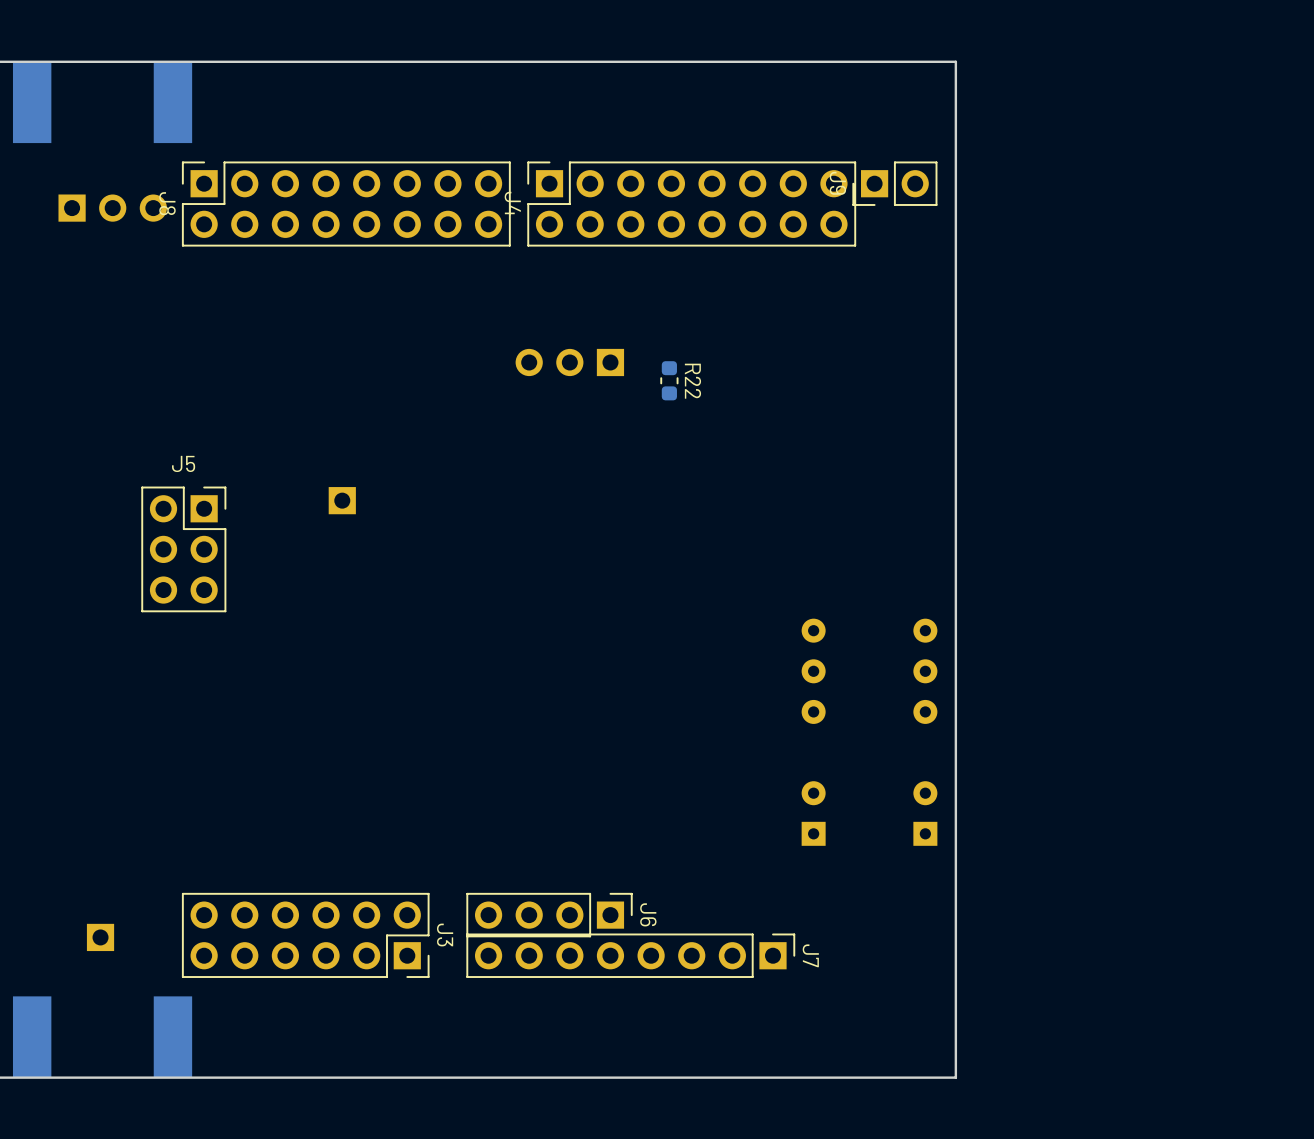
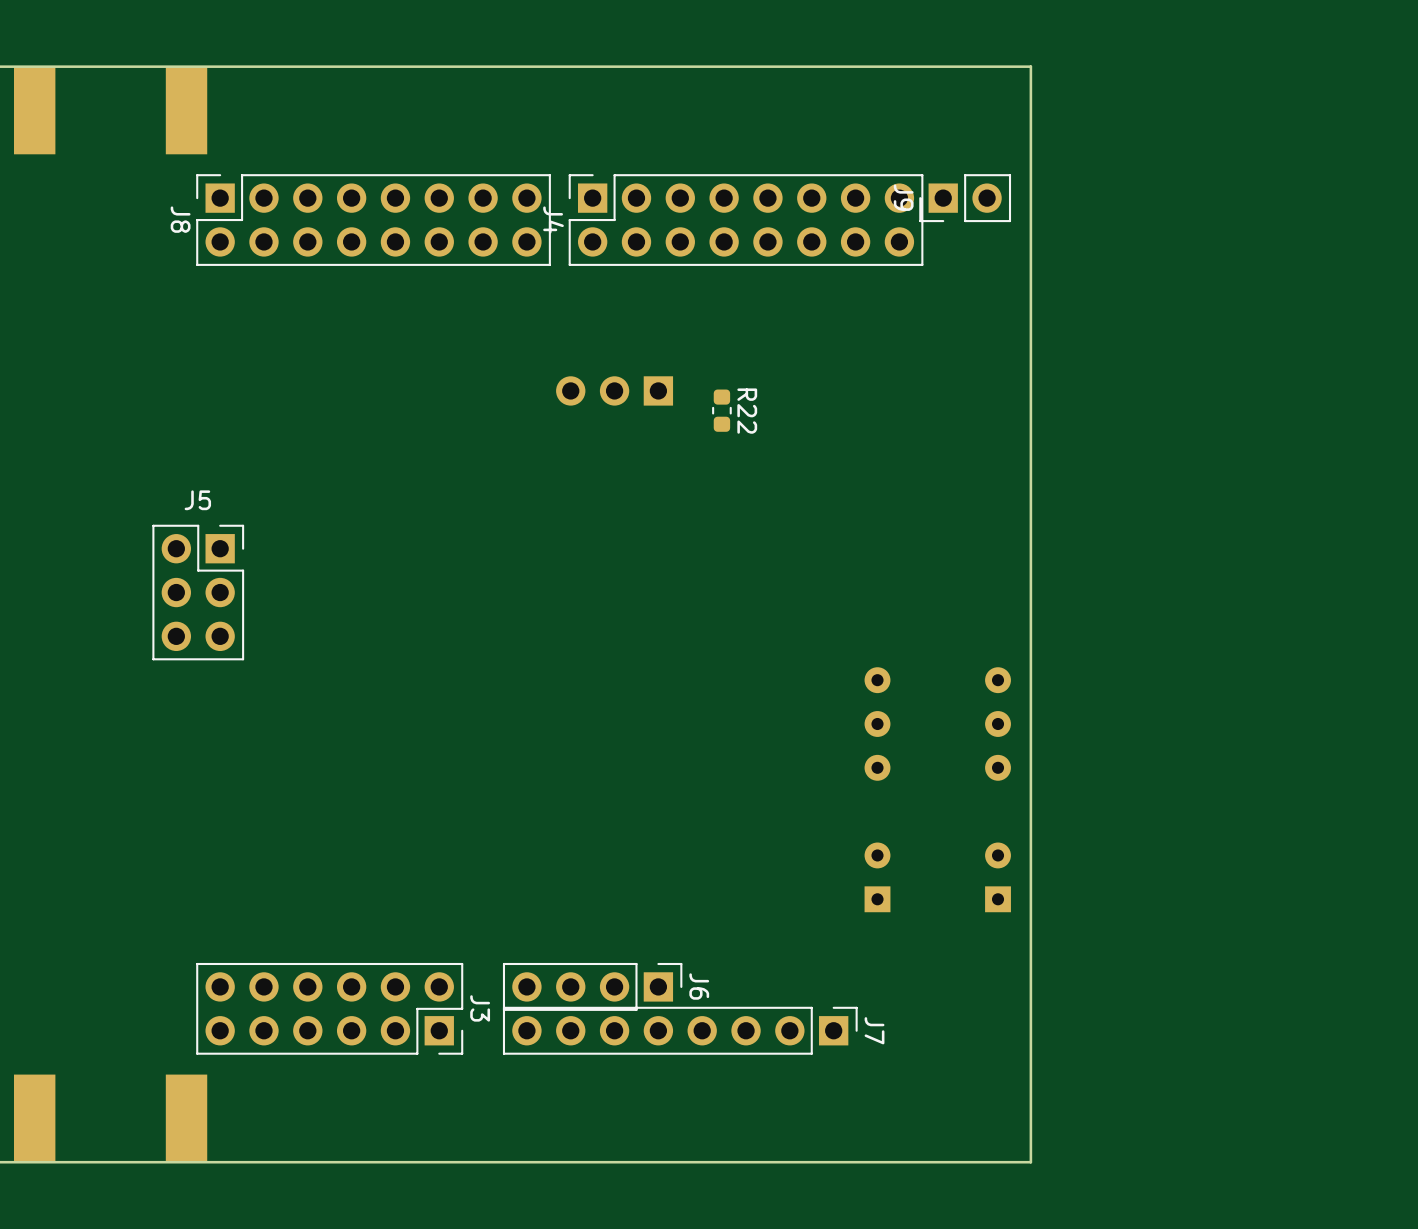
part: (112, 208) -> none
part: (342, 500) -> none
part: (100, 937) -> none

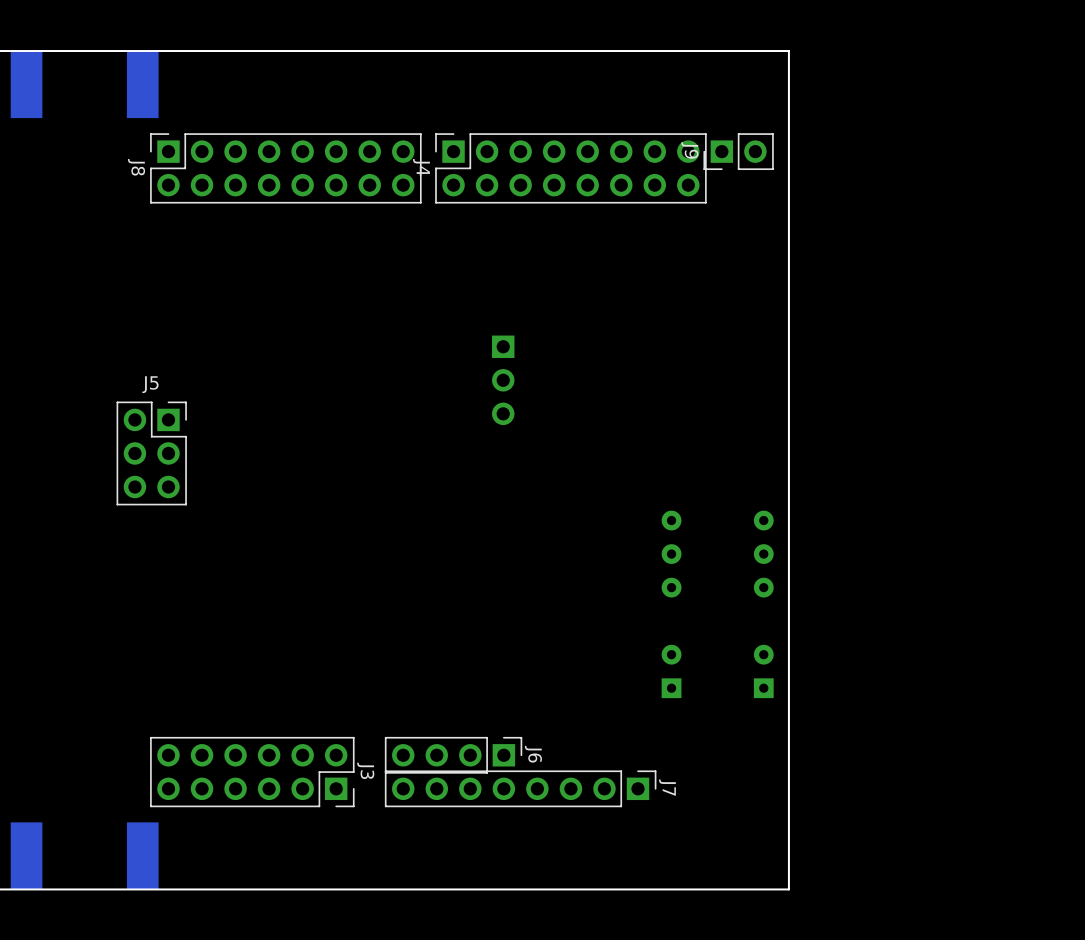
part rotation: 0° (614, 390) -> 90° counterclockwise (503, 380)
part position: (614, 390) -> (503, 380)
R22: (721, 410) -> none

